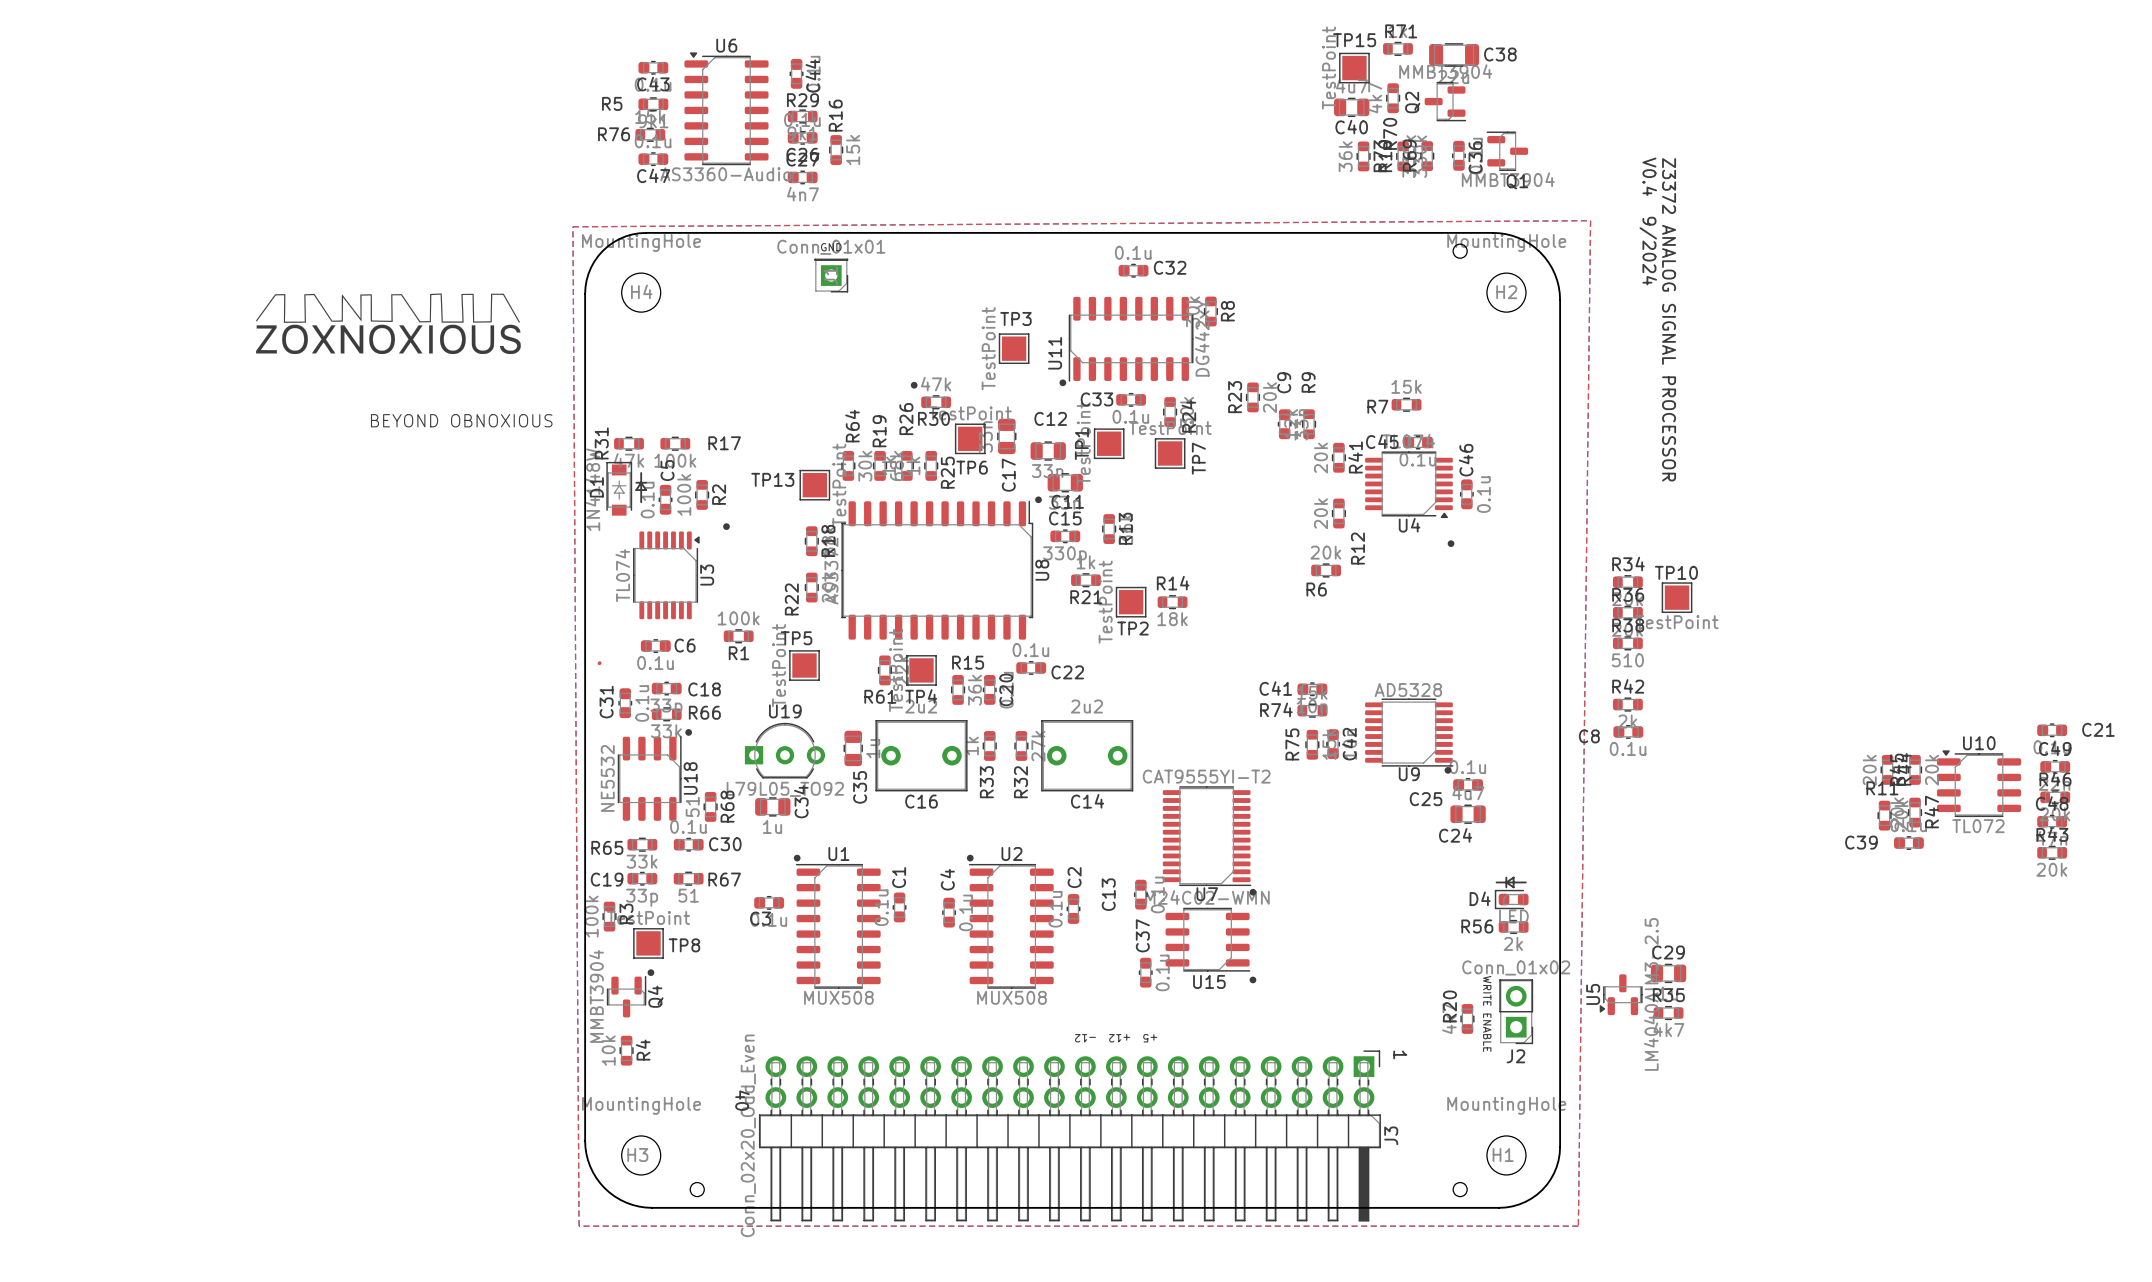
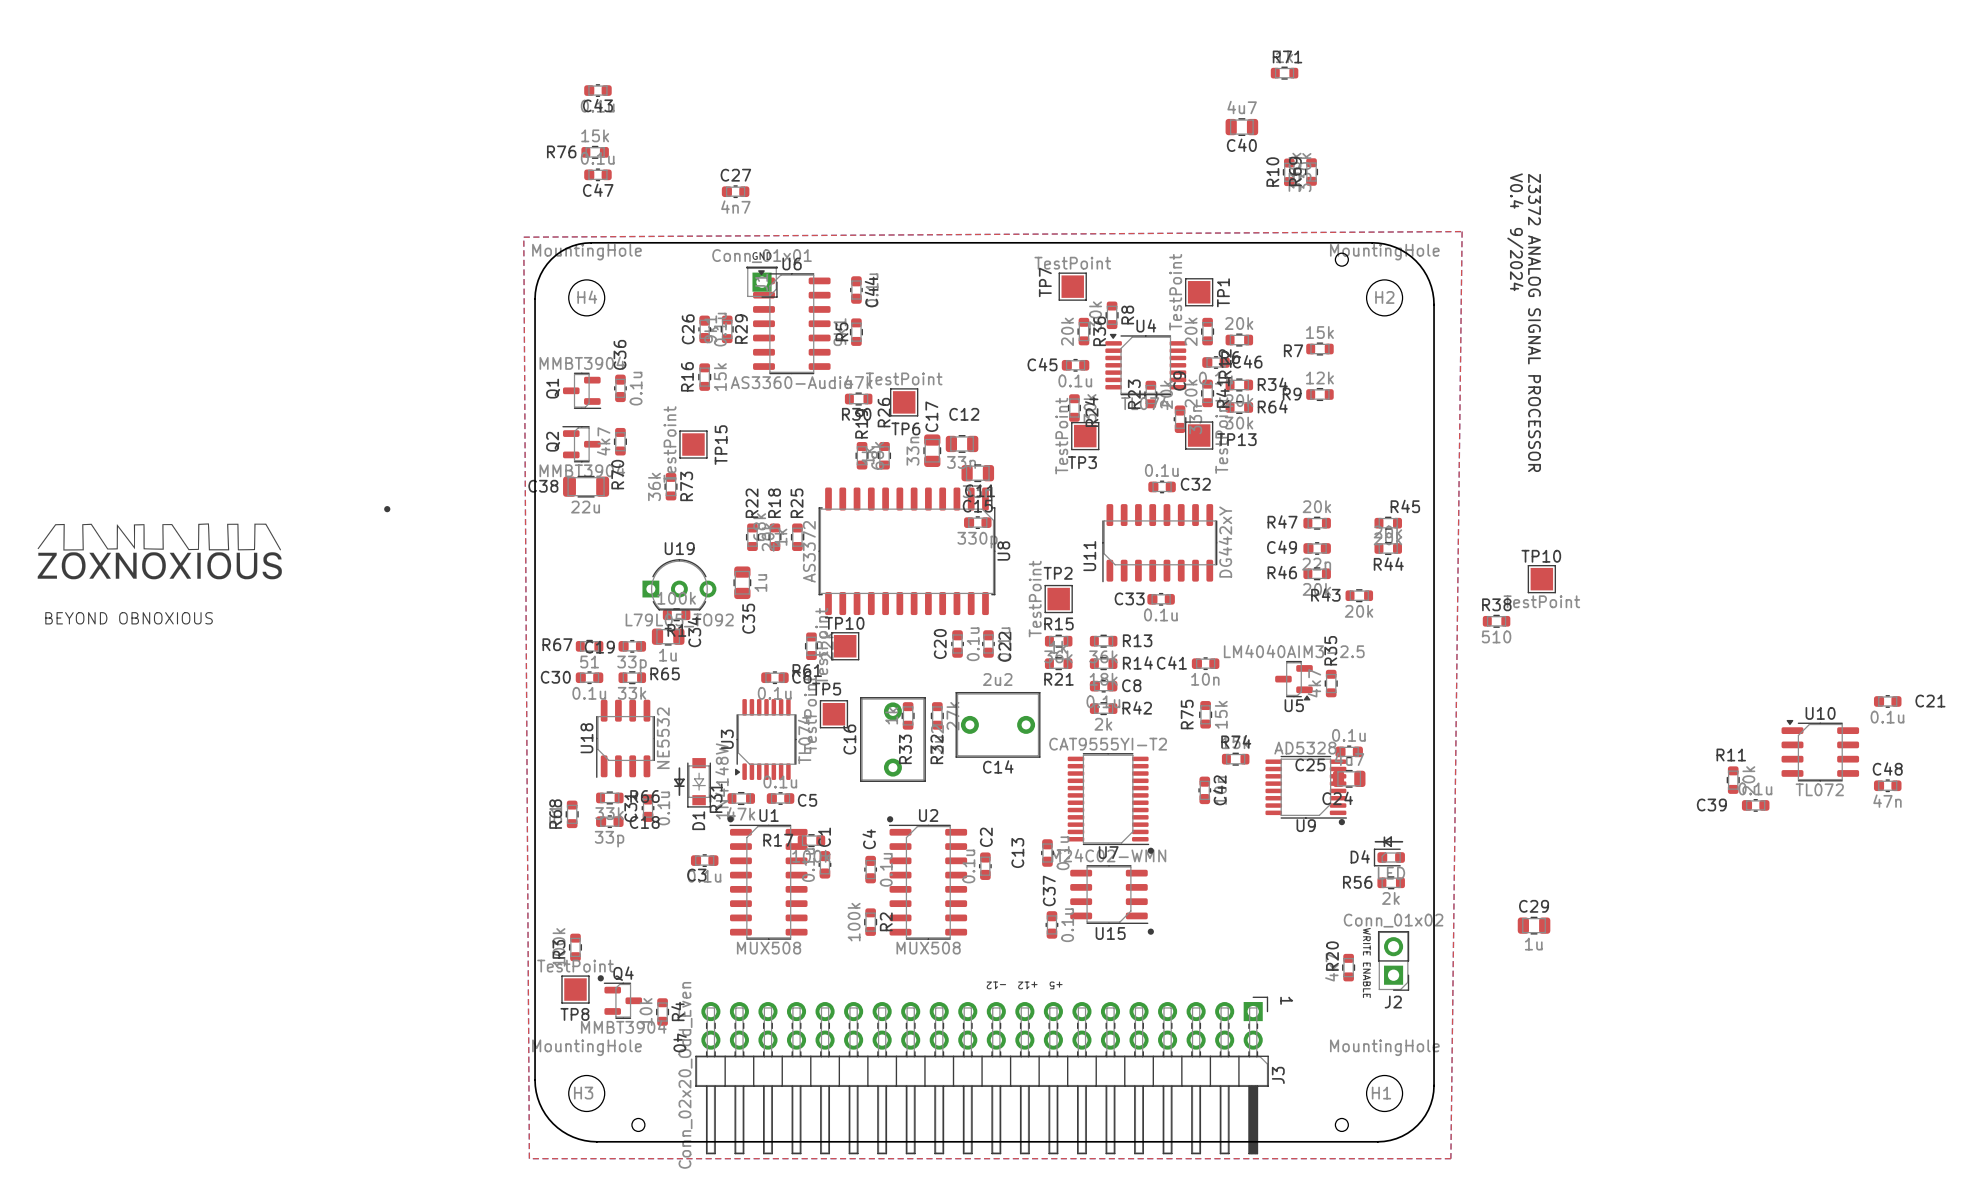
TP15 name rotation: 0° (1354, 40) -> 90° counterclockwise (721, 445)
C38 position: (1454, 54) -> (586, 486)
C38 name position: C38 (1500, 54) -> C38 (543, 486)
TP15 position: (1354, 68) -> (693, 444)
C44 position: (796, 73) -> (856, 290)
R70 position: (1393, 98) -> (620, 441)
Q2 rotation: 0° (1445, 101) -> 180° (581, 444)
Q2 position: (1445, 101) -> (581, 444)
R5 name position: R5 (612, 103) -> R5 (841, 331)
R5 rotation: 0° (653, 104) -> 90° clockwise (856, 332)
R5 position: (653, 104) -> (856, 332)
U6 position: (726, 108) -> (791, 322)
R16 name position: R16 (835, 115) -> R16 (687, 376)
R29 rotation: 0° (802, 116) -> 90° clockwise (727, 329)
R29 position: (802, 116) -> (727, 329)
C26 rotation: 0° (802, 137) -> 90° clockwise (704, 329)
C26 position: (802, 137) -> (704, 329)
R16 position: (836, 150) -> (704, 377)
Q1 rotation: 0° (1507, 151) -> 180° (582, 390)
Q1 position: (1507, 151) -> (582, 390)
C36 position: (1458, 155) -> (620, 388)
R73 position: (1363, 156) -> (671, 486)
C36 name position: C36 (1475, 157) -> C36 (620, 354)
Q1 name position: Q1 (1517, 181) -> Q1 (553, 388)
C32 position: (1133, 270) -> (1162, 486)
drawing: [255, 293, 521, 355] -> none
TP3 name position: TP3 (1015, 318) -> TP3 (1082, 462)
U11 position: (1131, 339) -> (1159, 543)
TP3 position: (1014, 348) -> (1085, 436)
drawing: [1059, 379, 1067, 387] -> none
drawing: [910, 381, 918, 389] -> none
R9 name position: R9 (1308, 382) -> R9 (1292, 394)
C33 position: (1131, 399) -> (1161, 599)
R7 position: (1406, 404) -> (1319, 349)
text: BEYOND OBNOXIOUS (461, 420) -> none
R9 rotation: 0° (1309, 424) -> 90° clockwise (1319, 394)
R9 position: (1309, 424) -> (1319, 394)
C17 position: (1006, 436) -> (932, 450)
TP6 position: (970, 438) -> (904, 402)
C45 position: (1418, 442) -> (1075, 365)
R31 position: (629, 443) -> (741, 798)
R17 position: (675, 443) -> (811, 840)
R17 name position: R17 (724, 443) -> R17 (778, 840)
TP1 position: (1109, 443) -> (1199, 292)
TP1 name position: TP1 (1081, 444) -> TP1 (1223, 292)
TP7 position: (1170, 453) -> (1072, 286)
R41 position: (1338, 457) -> (1207, 393)
TP7 name position: TP7 (1198, 458) -> TP7 (1045, 282)
R64 rotation: 0° (848, 465) -> 90° clockwise (1239, 407)
R64 position: (848, 465) -> (1239, 407)
R19 position: (880, 465) -> (862, 455)
R26 position: (906, 465) -> (884, 455)
R25 position: (931, 465) -> (797, 537)
line: (641, 472) (641, 502) -> none
R25 name position: R25 (947, 472) -> R25 (797, 503)
C17 name position: C17 (1008, 475) -> C17 (931, 416)
TP13 name position: TP13 (772, 479) -> TP13 (1236, 439)
line: (636, 482) (646, 482) -> none
line: (641, 482) (646, 490) (636, 490) (641, 482) -> none
U4 rotation: 0° (1408, 484) -> 180° (1145, 364)
U4 position: (1408, 484) -> (1145, 364)
TP13 position: (814, 485) -> (1199, 435)
D1 name position: D1 (596, 487) -> D1 (698, 820)
D1 rotation: 0° (619, 488) -> 180° (699, 782)
D1 position: (619, 488) -> (699, 782)
R2 position: (702, 494) -> (870, 922)
C46 rotation: 0° (1466, 494) -> 90° clockwise (1216, 362)
C46 position: (1466, 494) -> (1216, 362)
drawing: [1035, 496, 1042, 504] -> none
C5 rotation: 0° (665, 499) -> 90° clockwise (780, 798)
C5 position: (665, 499) -> (780, 798)
R12 position: (1338, 513) -> (1207, 331)
drawing: none -> [384, 506, 391, 513]
drawing: [723, 523, 730, 530] -> none
R13 rotation: 0° (1109, 529) -> 90° clockwise (1103, 641)
R13 position: (1109, 529) -> (1103, 641)
drawing: none -> [37, 523, 282, 580]
R18 name position: R18 (828, 540) -> R18 (774, 503)
drawing: [1447, 540, 1455, 548] -> none
R18 position: (811, 541) -> (774, 537)
R34 name position: R34 (1628, 564) -> R34 (1272, 384)
U8 position: (937, 570) -> (906, 550)
R6 position: (1326, 570) -> (1239, 340)
U3 rotation: 0° (666, 575) -> 180° (765, 739)
U3 position: (666, 575) -> (765, 739)
R21 position: (1086, 580) -> (1058, 663)
R34 position: (1627, 582) -> (1239, 384)
R14 name position: R14 (1173, 583) -> R14 (1137, 662)
R22 position: (811, 587) -> (752, 537)
R22 name position: R22 (791, 599) -> R22 (752, 503)
TP2 position: (1131, 602) -> (1058, 599)
R14 position: (1172, 602) -> (1103, 663)
R36 rotation: 0° (1627, 612) -> 90° clockwise (1083, 331)
R36 position: (1627, 612) -> (1083, 331)
TP2 name position: TP2 (1132, 628) -> TP2 (1058, 573)
text: none -> BEYOND OBNOXIOUS (129, 618)
C6 position: (655, 646) -> (774, 677)
top track: (599, 663) (599, 663) -> none
TP5 position: (804, 665) -> (833, 714)
C22 rotation: 0° (1031, 667) -> 90° clockwise (988, 643)
C22 position: (1031, 667) -> (988, 643)
R42 name position: R42 (1628, 686) -> R42 (1137, 707)
C18 position: (666, 688) -> (609, 821)
R15 rotation: 0° (958, 689) -> 90° clockwise (1058, 641)
R15 position: (958, 689) -> (1058, 641)
C20 position: (989, 689) -> (957, 643)
C20 name position: C20 (1006, 689) -> C20 (940, 643)
TP4 name: TP4 (921, 696) -> TP10 (844, 623)
C31 position: (625, 703) -> (648, 808)
R42 position: (1627, 704) -> (1103, 708)
R74 name position: R74 (1276, 709) -> R74 (1236, 741)
R74 position: (1312, 710) -> (1235, 759)
R66 position: (666, 714) -> (609, 797)
drawing: [685, 729, 693, 736] -> none
C8 position: (1628, 731) -> (1103, 686)
U9 position: (1409, 732) -> (1306, 787)
C8 name position: C8 (1589, 736) -> C8 (1131, 685)
C42 position: (1333, 744) -> (1204, 790)
C35 position: (853, 748) -> (742, 582)
C49 name position: C49 (2055, 748) -> C49 (1282, 547)
U19 position: (784, 750) -> (679, 584)
C16 rotation: 0° (921, 755) -> 90° clockwise (892, 739)
C49 position: (2055, 766) -> (1317, 548)
R44 rotation: 0° (1887, 769) -> 90° clockwise (1388, 548)
R44 position: (1887, 769) -> (1388, 548)
R45 rotation: 0° (1915, 769) -> 90° clockwise (1388, 523)
R45 position: (1915, 769) -> (1388, 523)
drawing position: (1447, 770) -> (1341, 822)
U18 rotation: 0° (649, 778) -> 180° (625, 738)
R46 name position: R46 (2055, 779) -> R46 (1282, 572)
R46 position: (2055, 797) -> (1317, 573)
line: none -> (679, 768) (679, 795)
R68 position: (710, 806) -> (572, 814)
R68 name position: R68 (727, 806) -> R68 (555, 814)
C34 position: (772, 806) -> (668, 636)
R47 name position: R47 (1931, 811) -> R47 (1282, 521)
R47 rotation: 0° (1915, 812) -> 90° clockwise (1317, 523)
R47 position: (1915, 812) -> (1317, 523)
line: none -> (674, 779) (683, 779) (679, 786) (674, 779)
line: none -> (674, 786) (683, 786)
C30 value position: 0.1u (688, 826) -> 0.1u (589, 693)
R43 name position: R43 (2052, 834) -> R43 (1325, 595)
R65 position: (642, 844) -> (632, 677)
C30 position: (688, 844) -> (589, 677)
C30 name position: C30 (725, 844) -> C30 (555, 677)
R65 name position: R65 (607, 847) -> R65 (665, 673)
R43 position: (2052, 852) -> (1359, 595)
C19 position: (642, 878) -> (632, 646)
R67 position: (688, 878) -> (589, 646)
R67 name position: R67 (724, 879) -> R67 (557, 644)
R3 name position: R3 (626, 913) -> R3 (558, 949)
R3 position: (609, 916) -> (575, 947)
TP8 position: (648, 943) -> (575, 989)
TP8 name position: TP8 (684, 945) -> TP8 (574, 1014)
drawing position: (650, 972) -> (600, 978)
U5 rotation: 0° (1621, 994) -> 90° counterclockwise (1293, 680)
U5 position: (1621, 994) -> (1293, 680)
Q4 rotation: 0° (626, 996) -> 90° counterclockwise (622, 1000)
Q4 position: (626, 996) -> (622, 1000)
R35 rotation: 0° (1668, 1013) -> 90° clockwise (1331, 683)
R35 position: (1668, 1013) -> (1331, 683)
R4 position: (626, 1050) -> (662, 1012)

